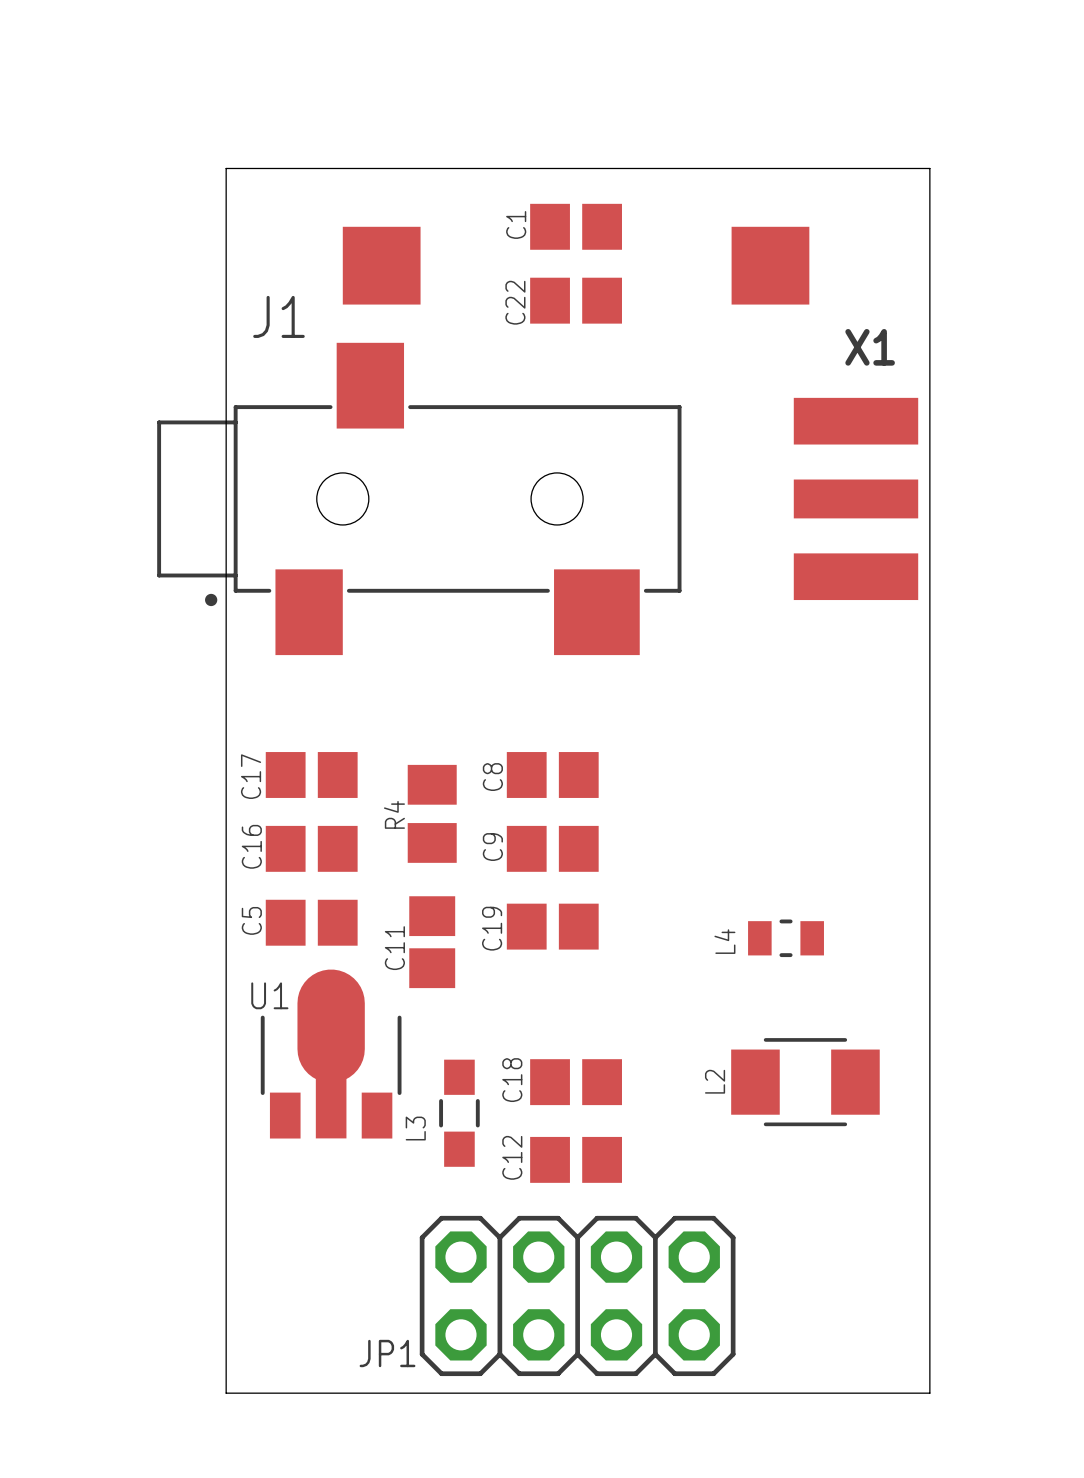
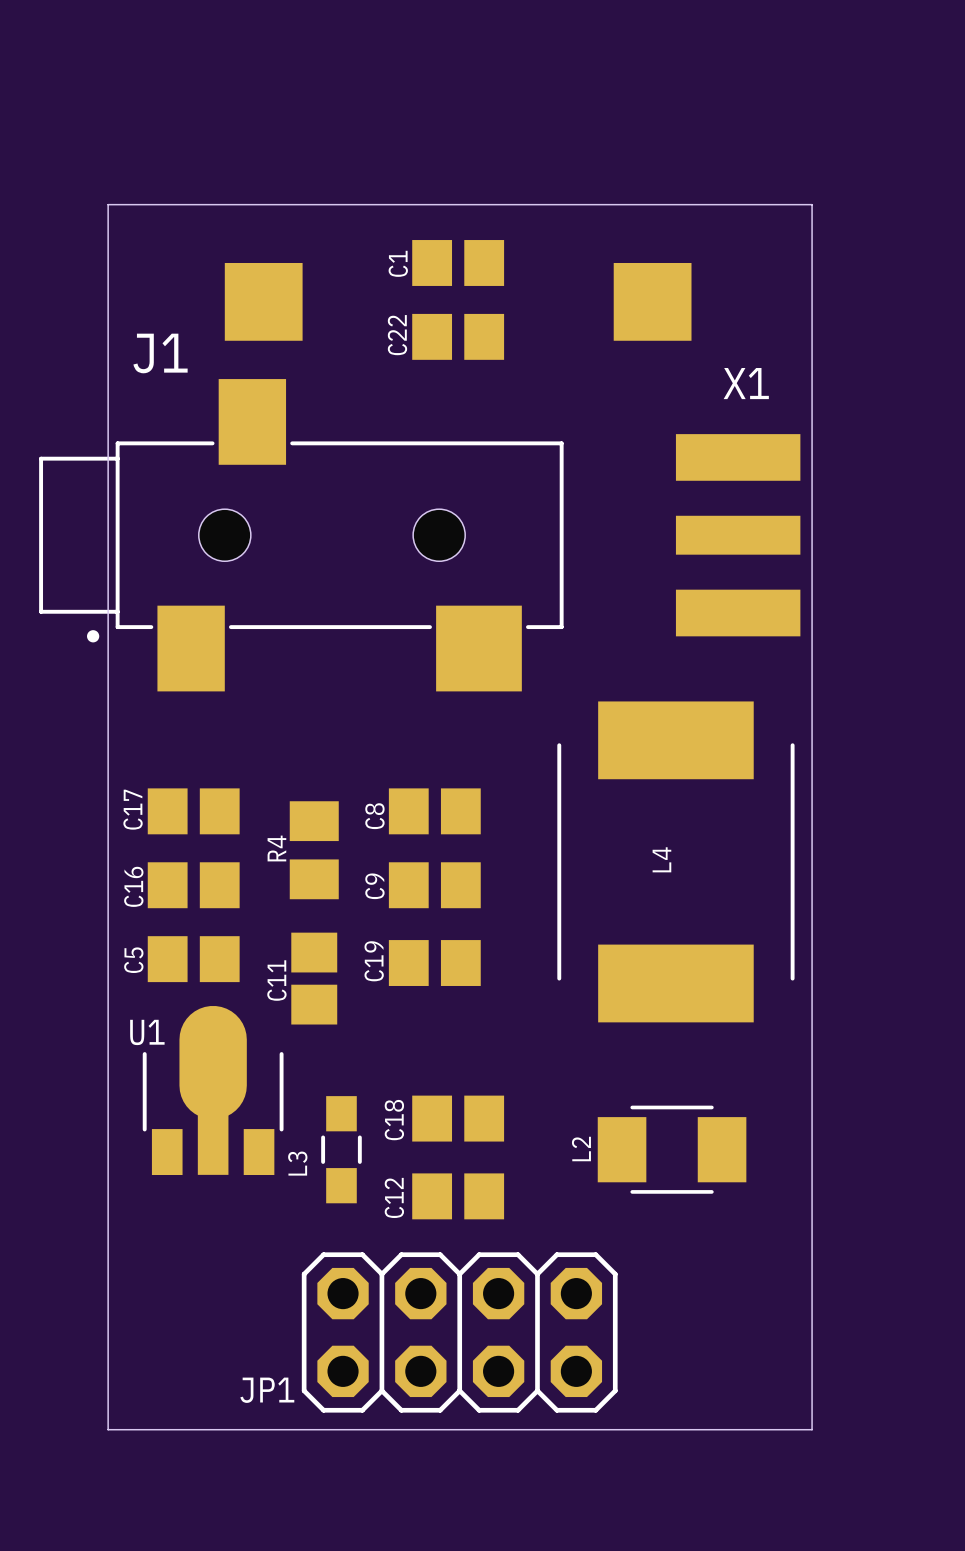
L4 footprint: [748, 919, 824, 958] -> [557, 701, 795, 1023]
L2 position: (805, 1082) -> (672, 1149)

